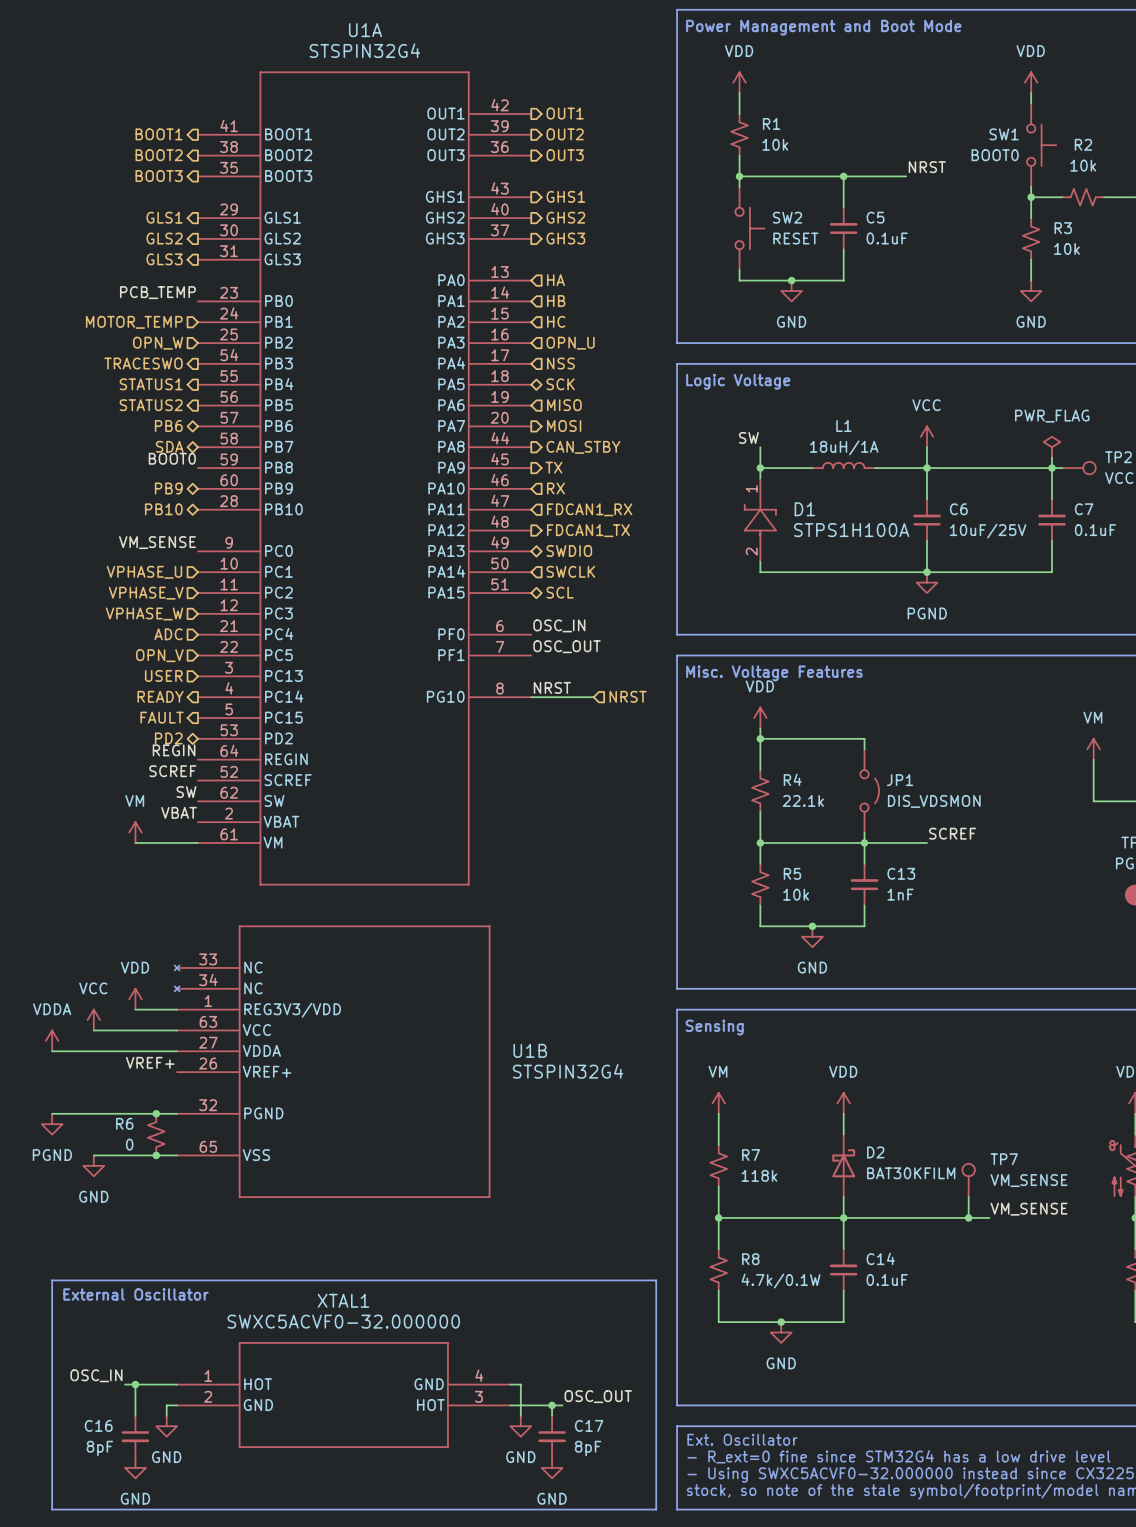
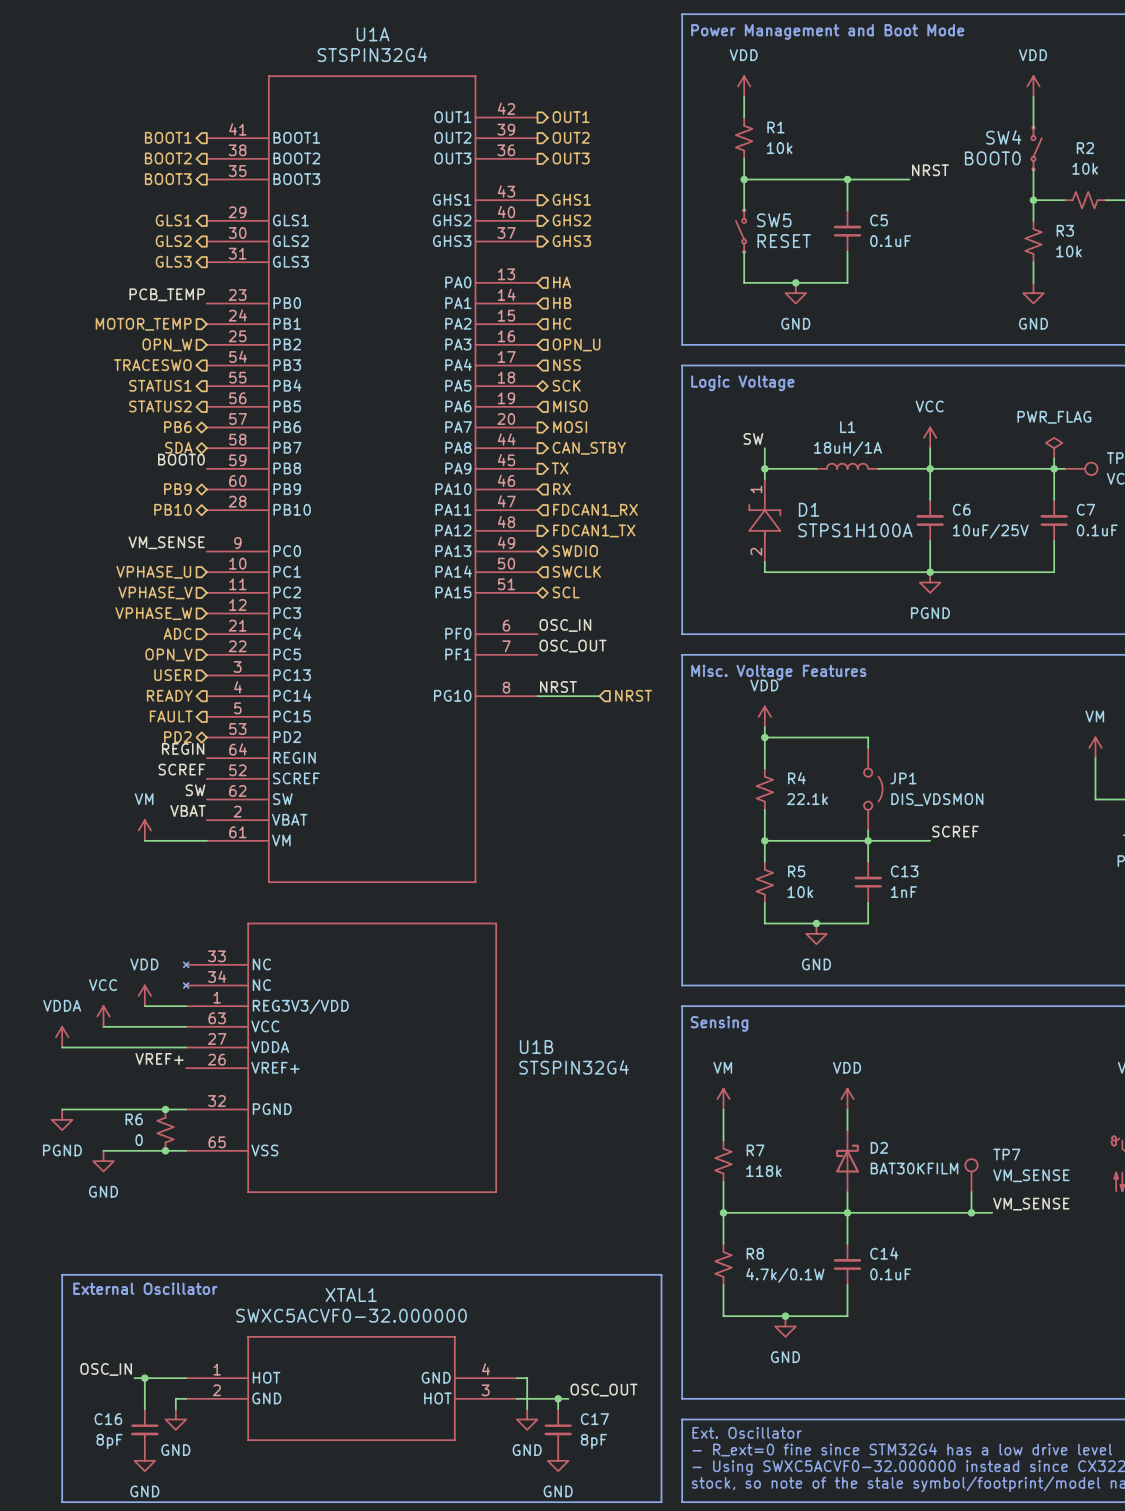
SW4: none -> BOOT0 (1036, 148)
SW1: BOOT0 (1041, 145) -> none
SW5: none -> RESET (741, 231)
SW2: RESET (749, 228) -> none

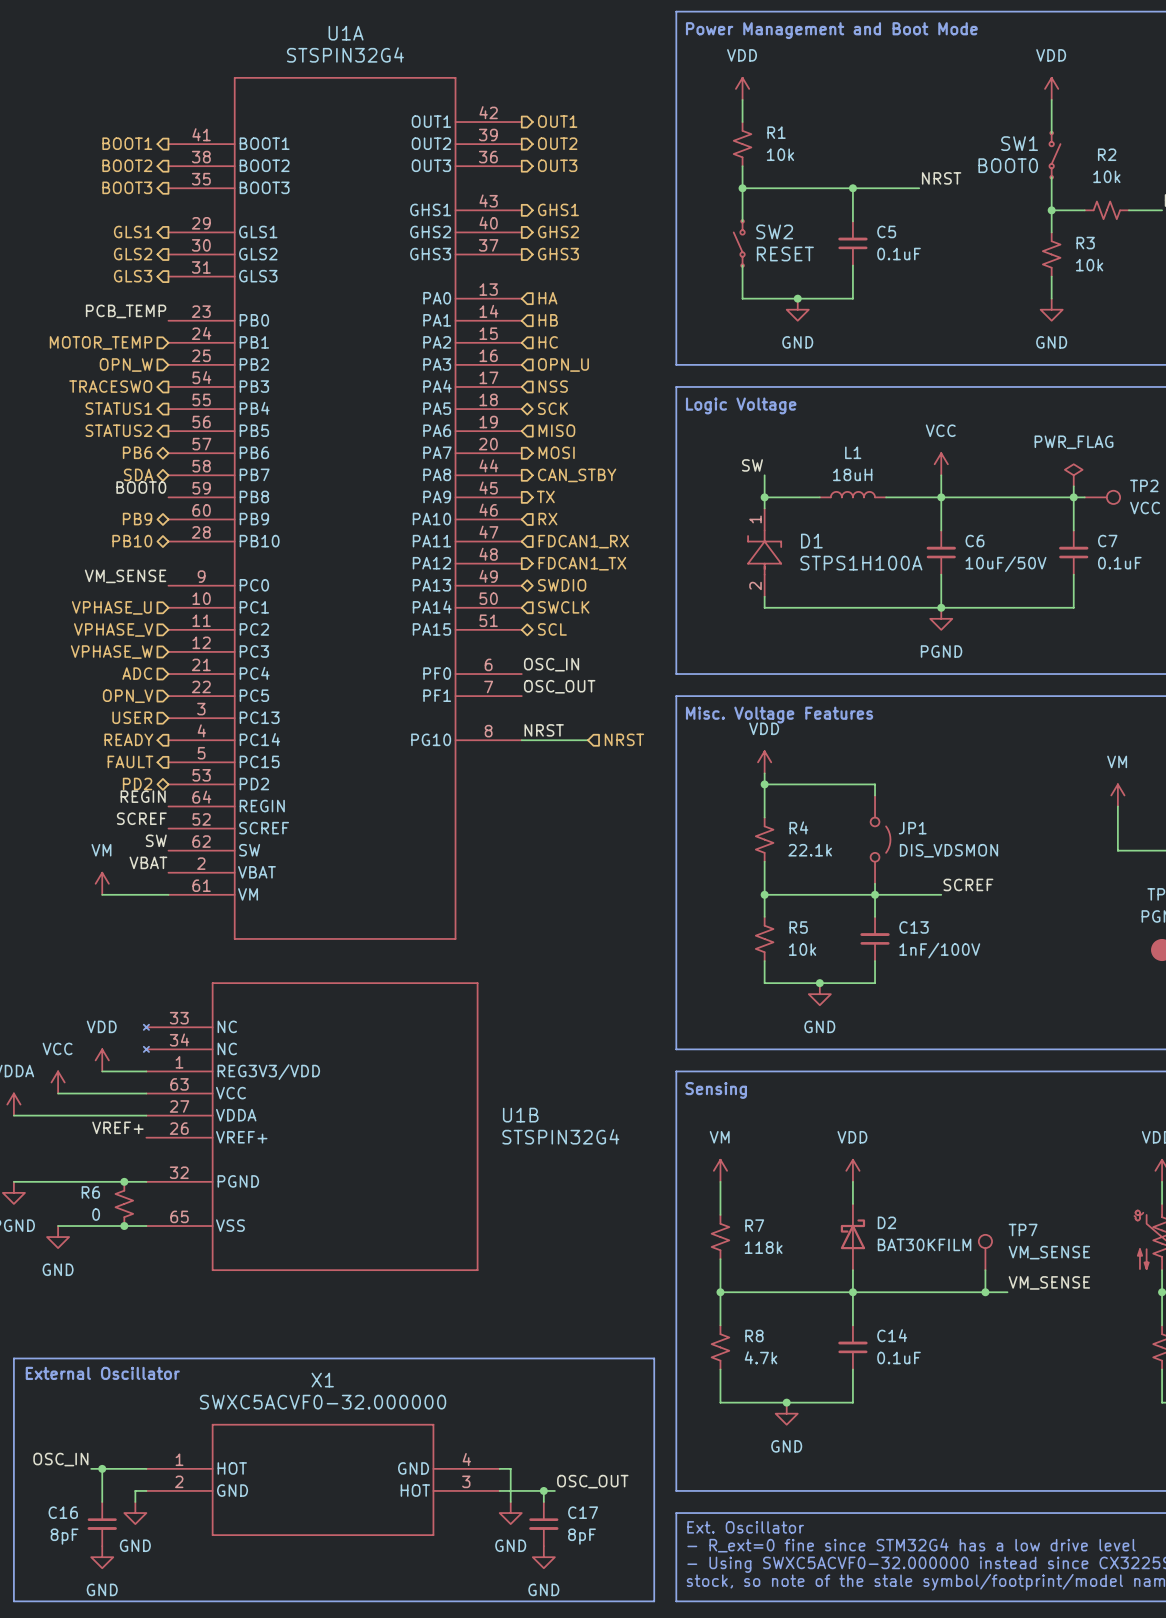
SW4 name: SW4 (1003, 137) -> SW1 (1019, 143)
SW5 name: SW5 (774, 220) -> SW2 (774, 231)
L1 value: 18uH/1A (847, 448) -> 18uH (852, 474)
C6 value: 10uF/25V (990, 531) -> 10uF/50V (1006, 564)
C13 value: 1nF (903, 892) -> 1nF/100V (939, 950)
R8 value: 4.7k/0.1W (785, 1275) -> 4.7k (761, 1357)
XTAL1 name: XTAL1 (351, 1295) -> X1 (322, 1380)

